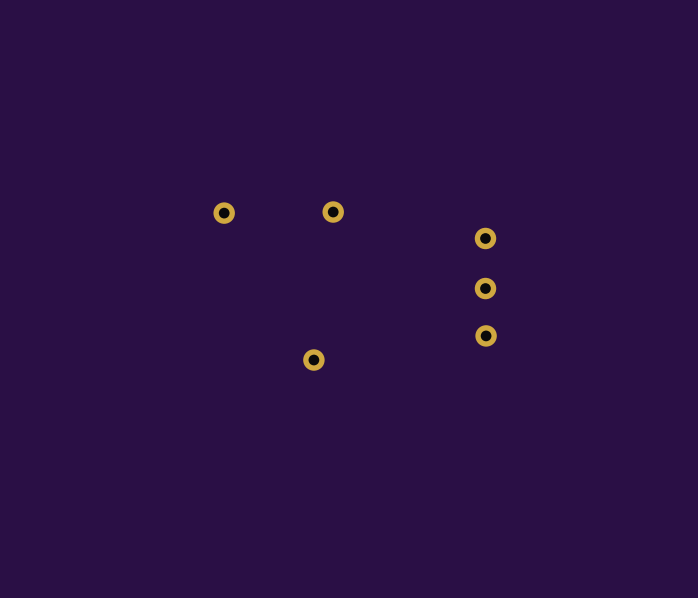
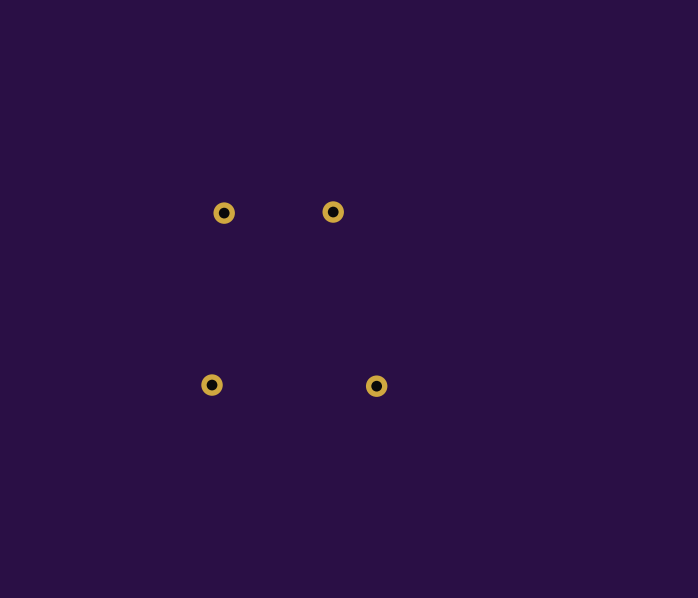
via: (485, 238) -> none
via: (485, 288) -> none
via: (486, 335) -> none
via: (313, 360) -> none
via: none -> (212, 385)
via: none -> (376, 386)

